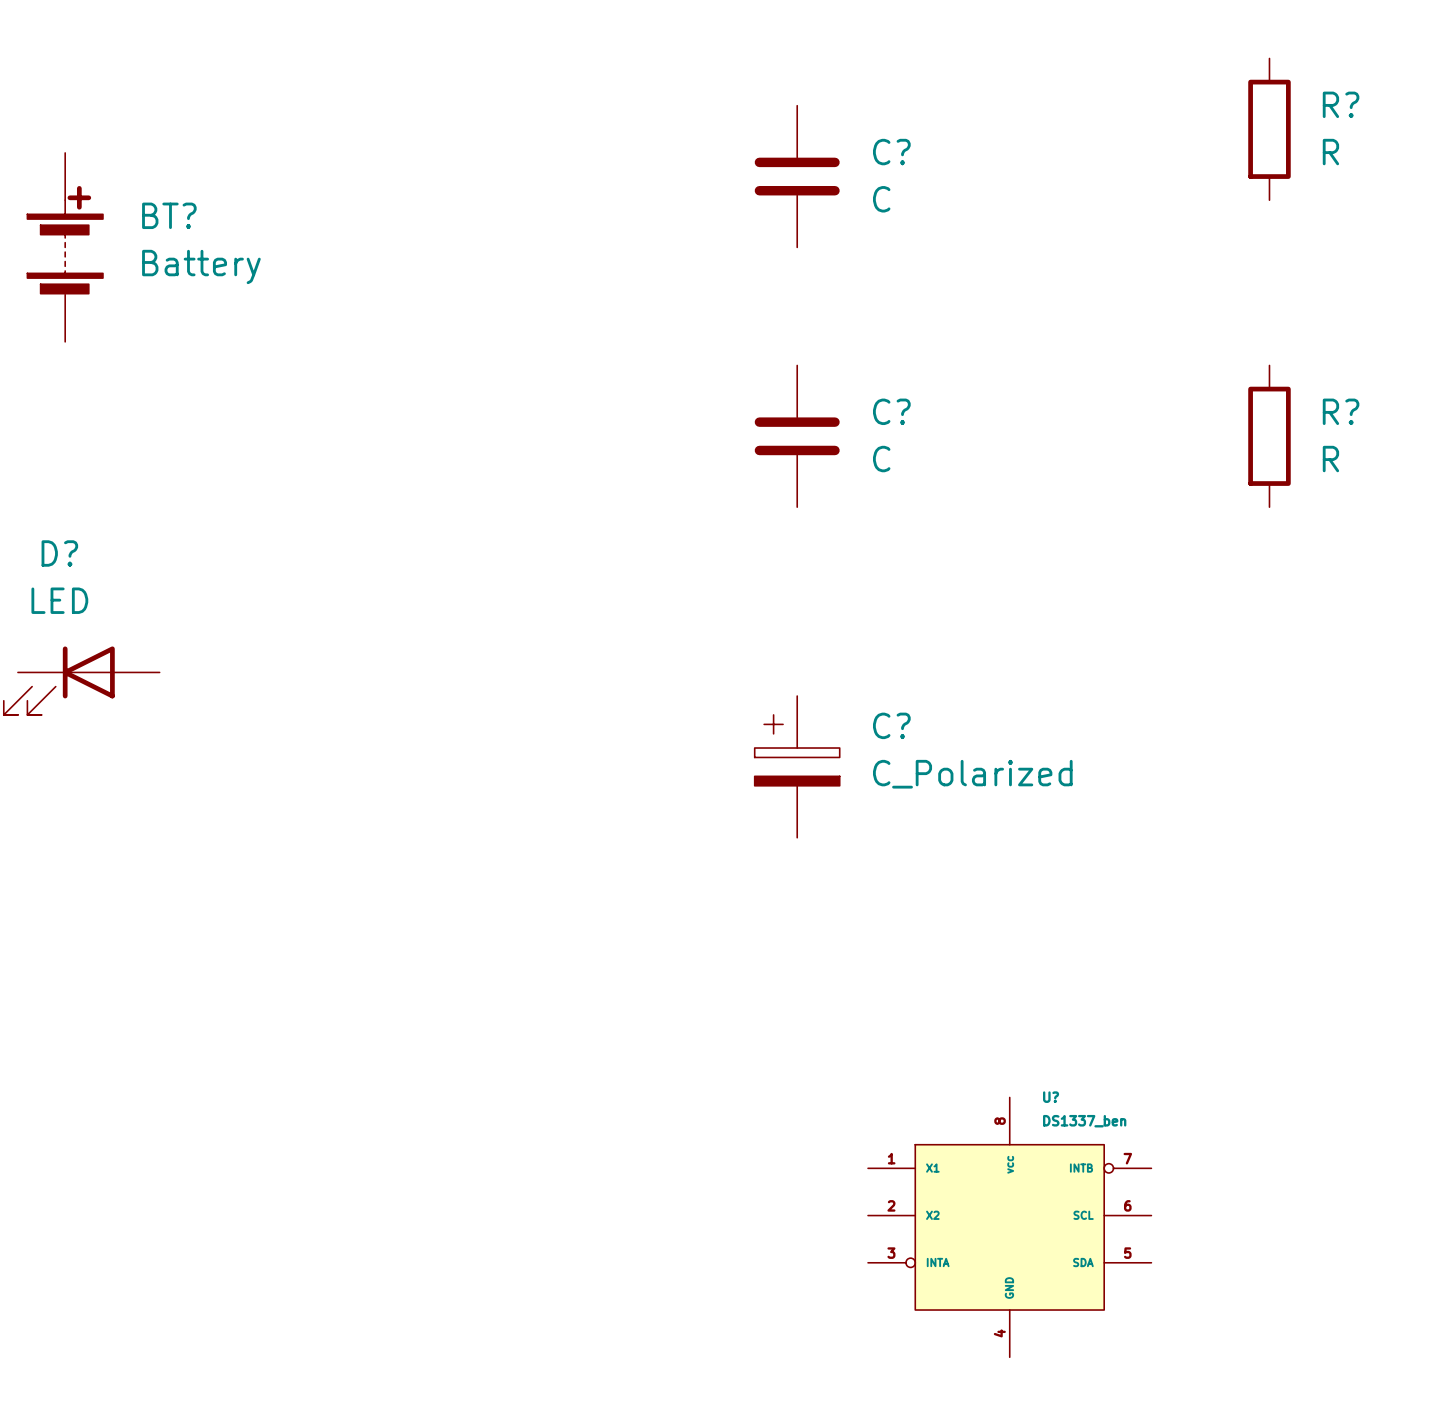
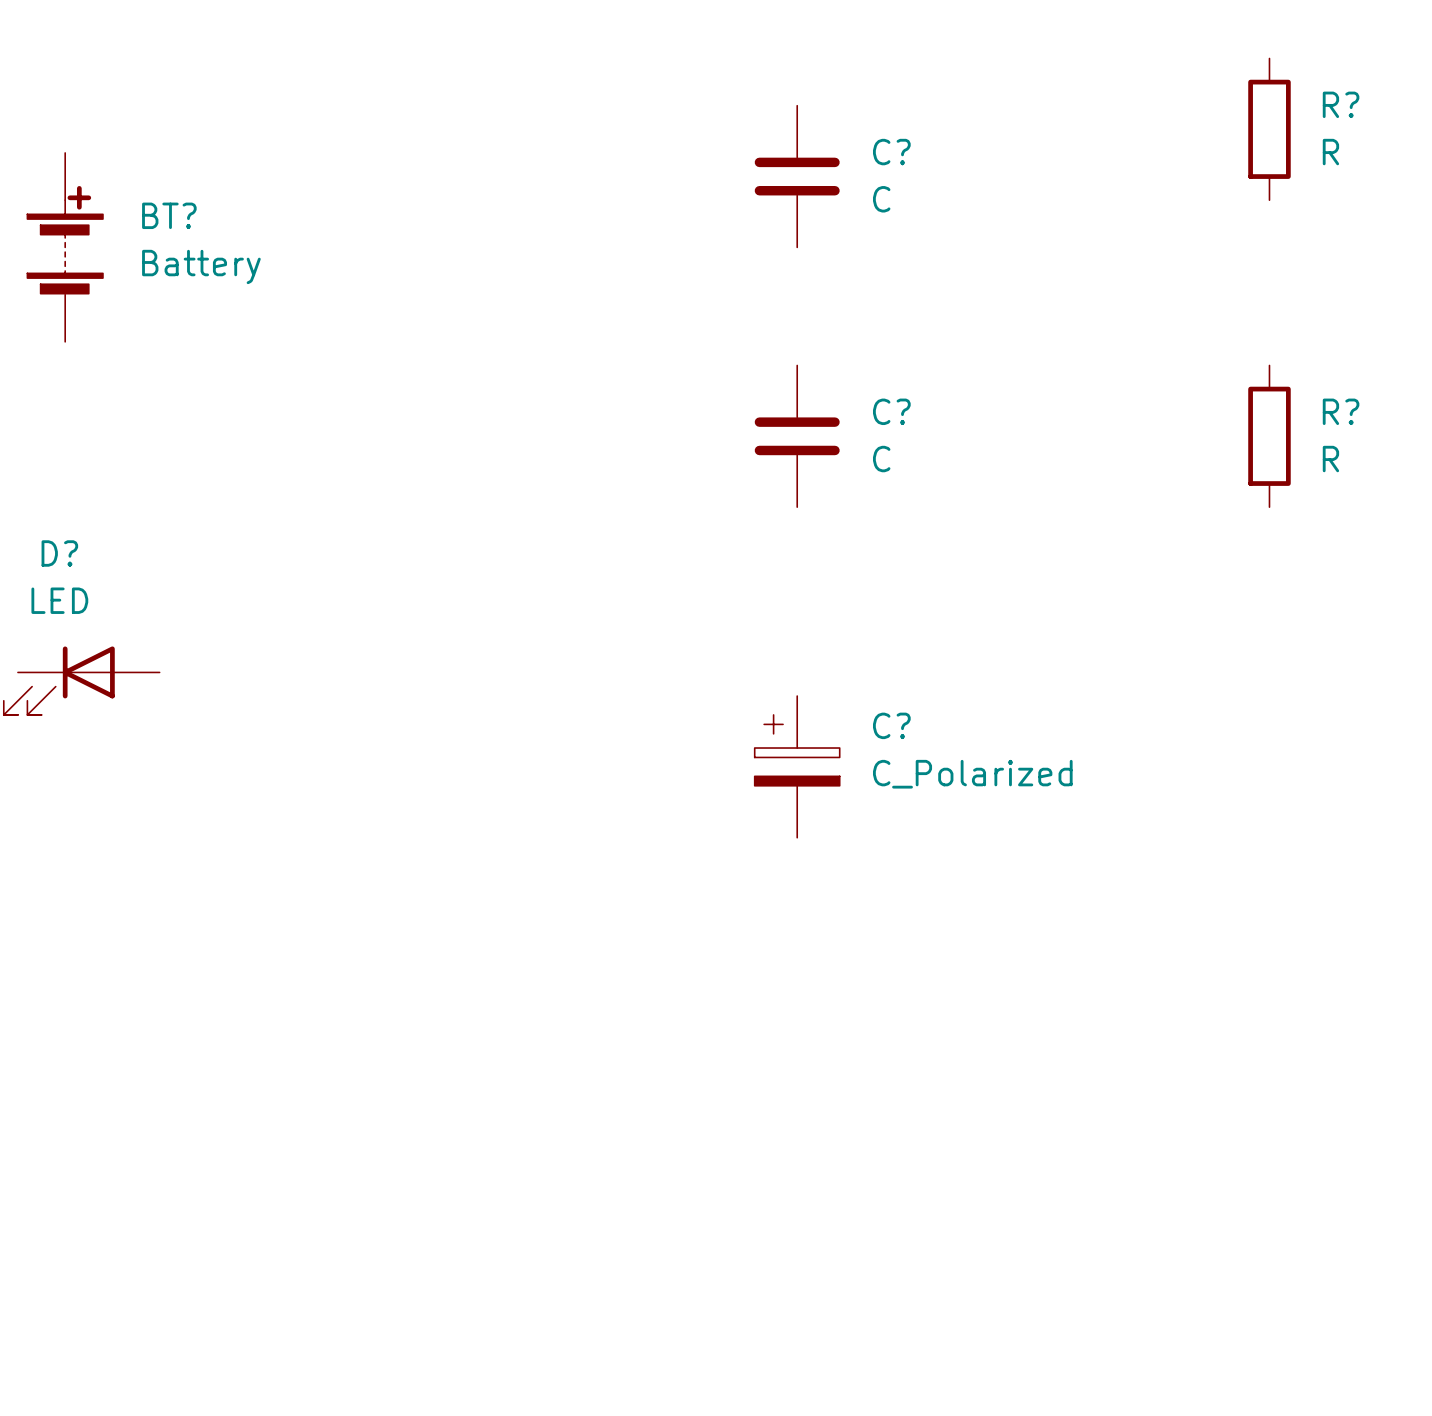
U?: DS1337_ben (1009, 1227) -> none

